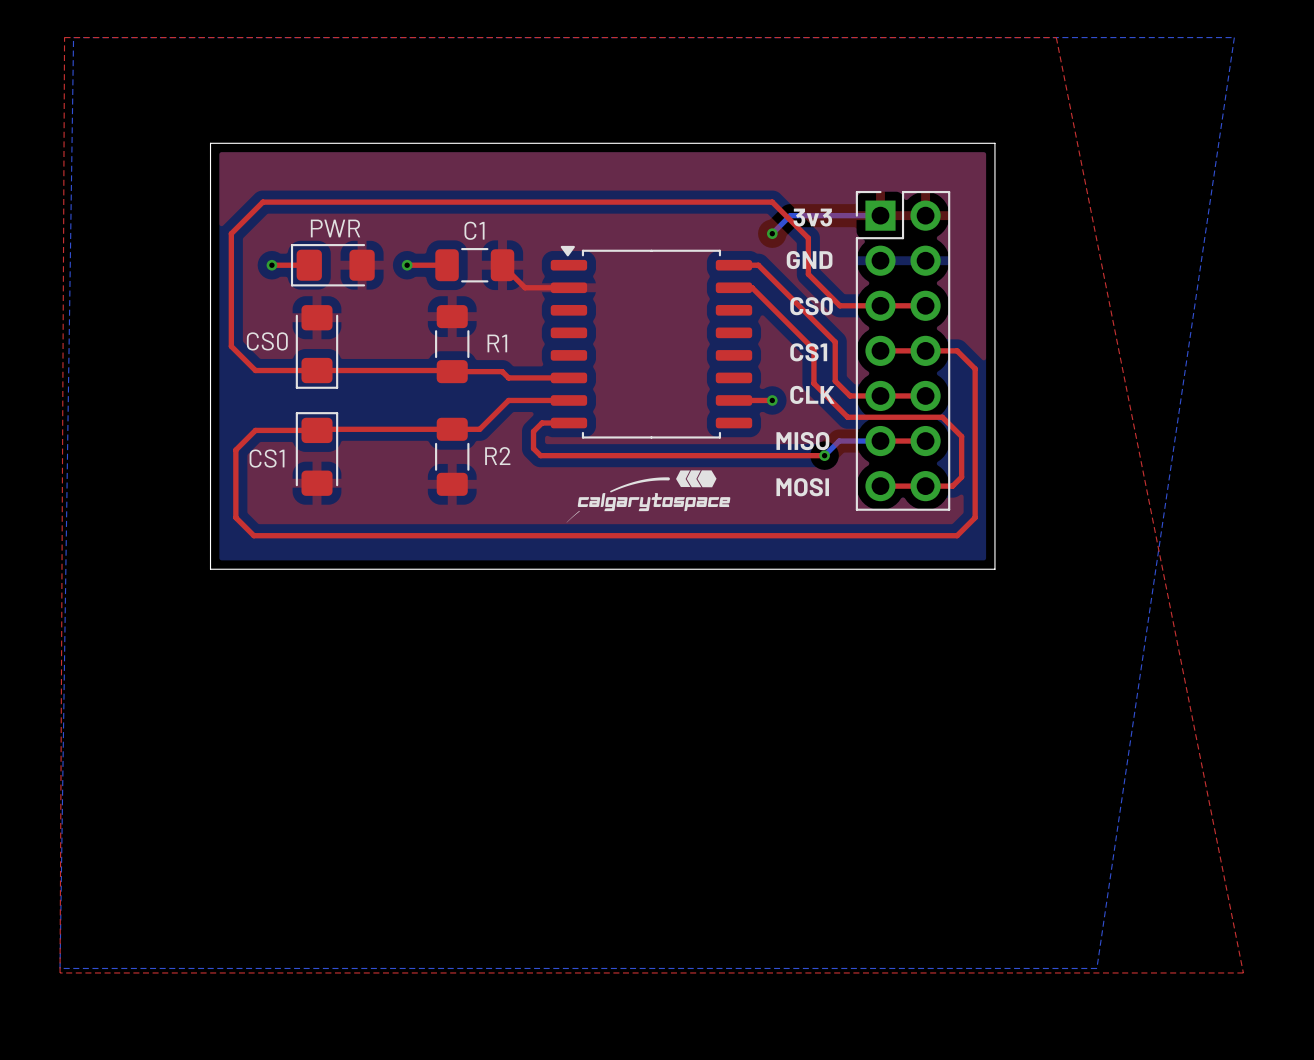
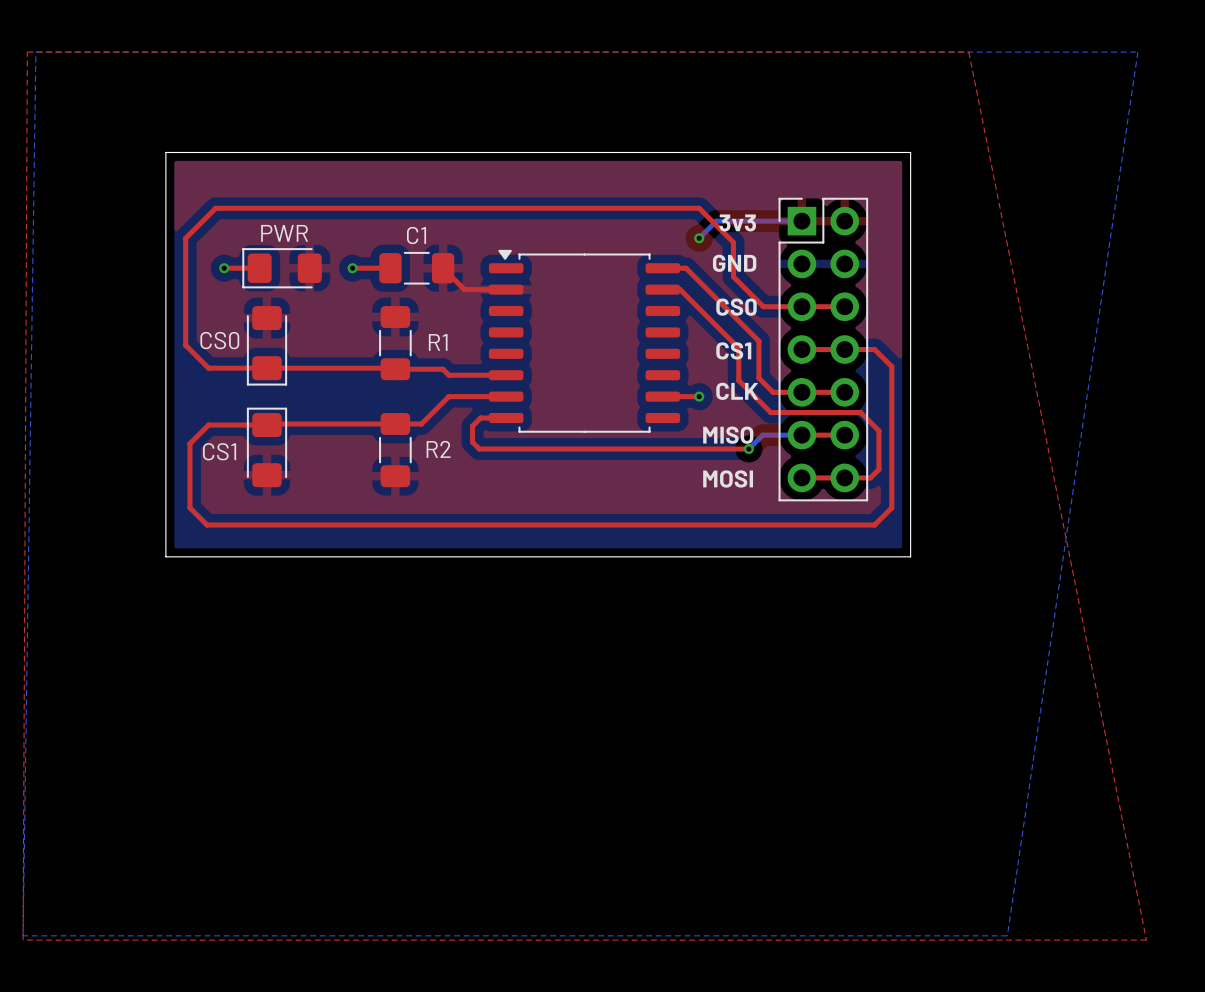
drawing: [566, 470, 731, 523] -> none

